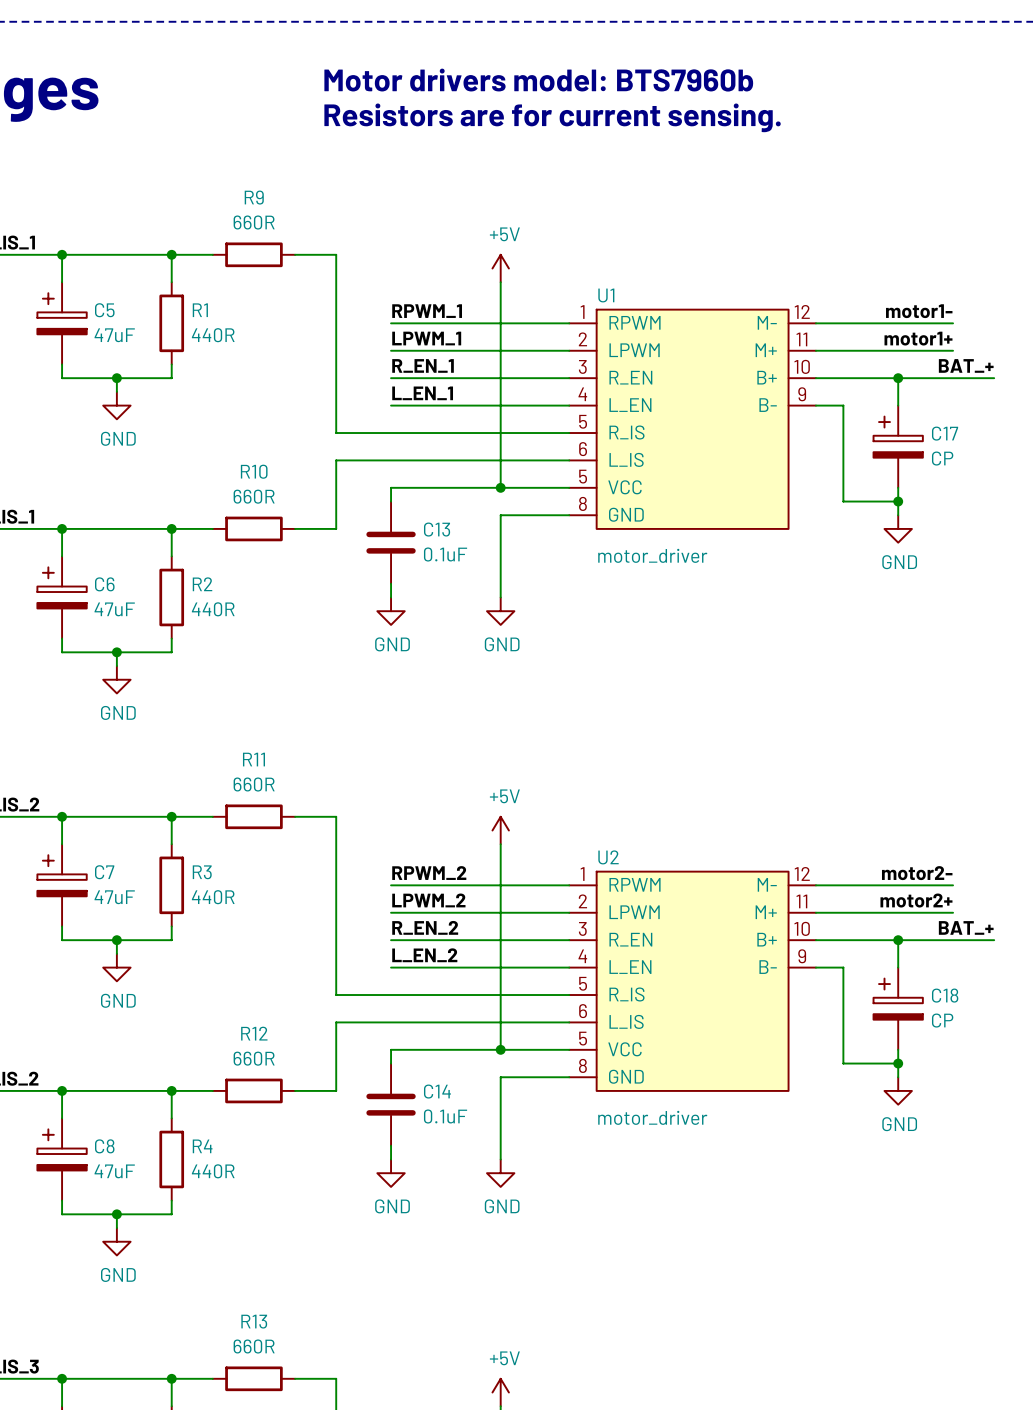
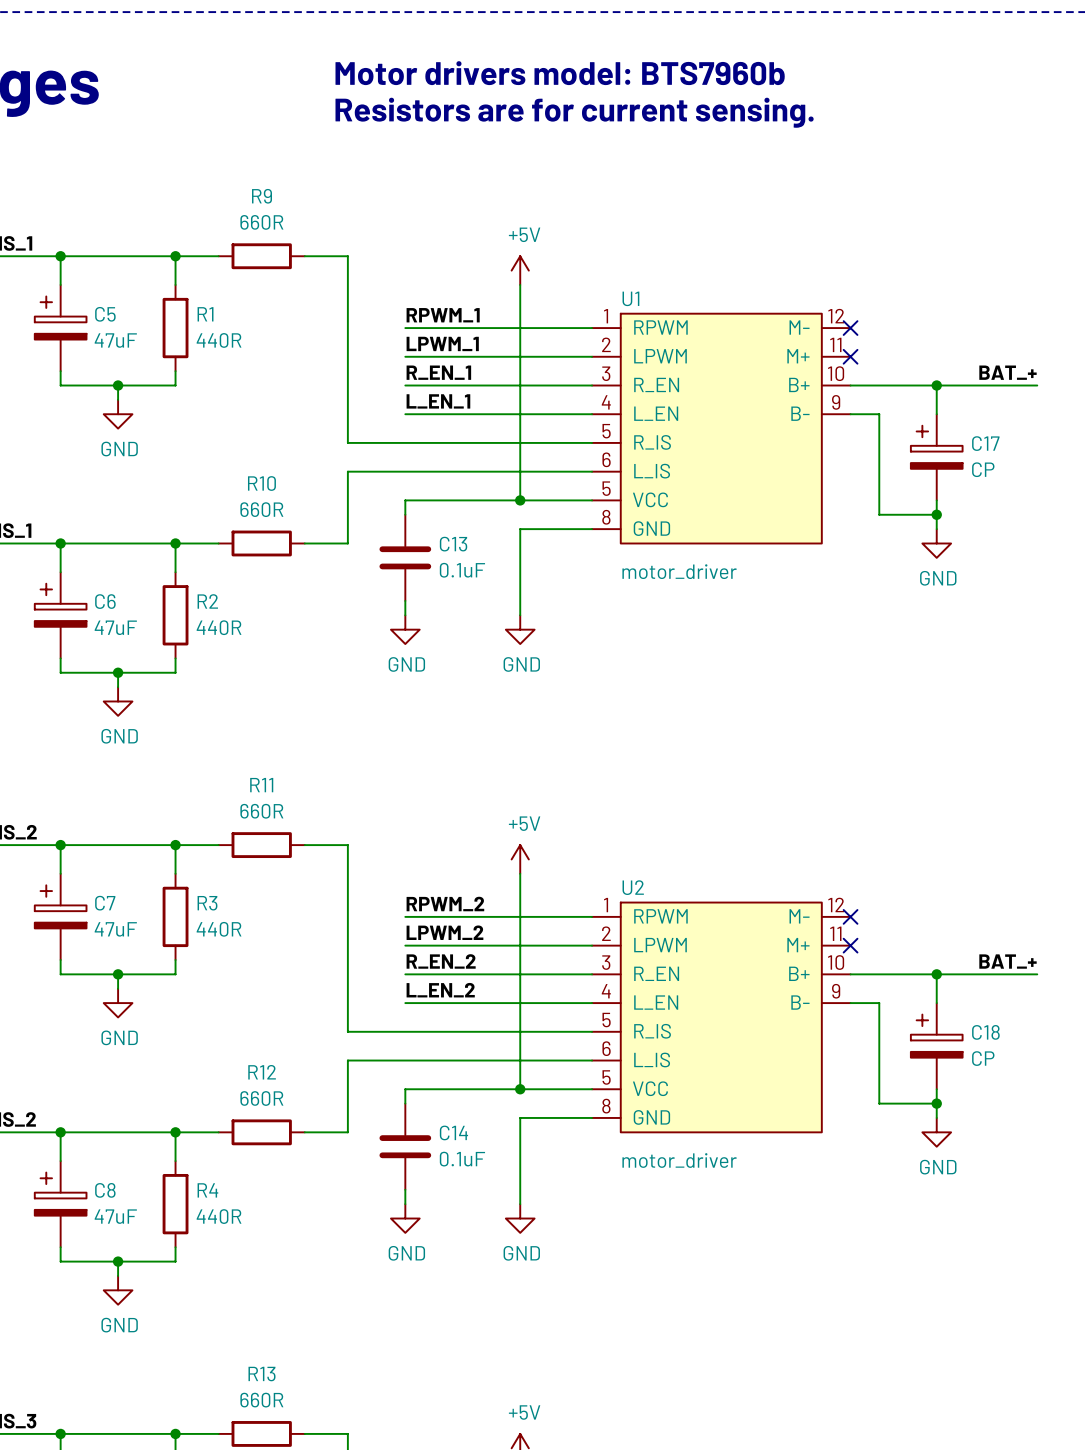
label: motor1- (919, 311) -> none
wire: (815, 323) (953, 323) -> none
no-connect mark: none -> (850, 328)
label: motor1+ (918, 338) -> none
wire: (815, 350) (953, 350) -> none
no-connect mark: none -> (850, 356)
label: motor2- (917, 873) -> none
wire: (815, 885) (953, 885) -> none
no-connect mark: none -> (850, 916)
label: motor2+ (916, 900) -> none
wire: (815, 912) (953, 912) -> none
no-connect mark: none -> (850, 945)

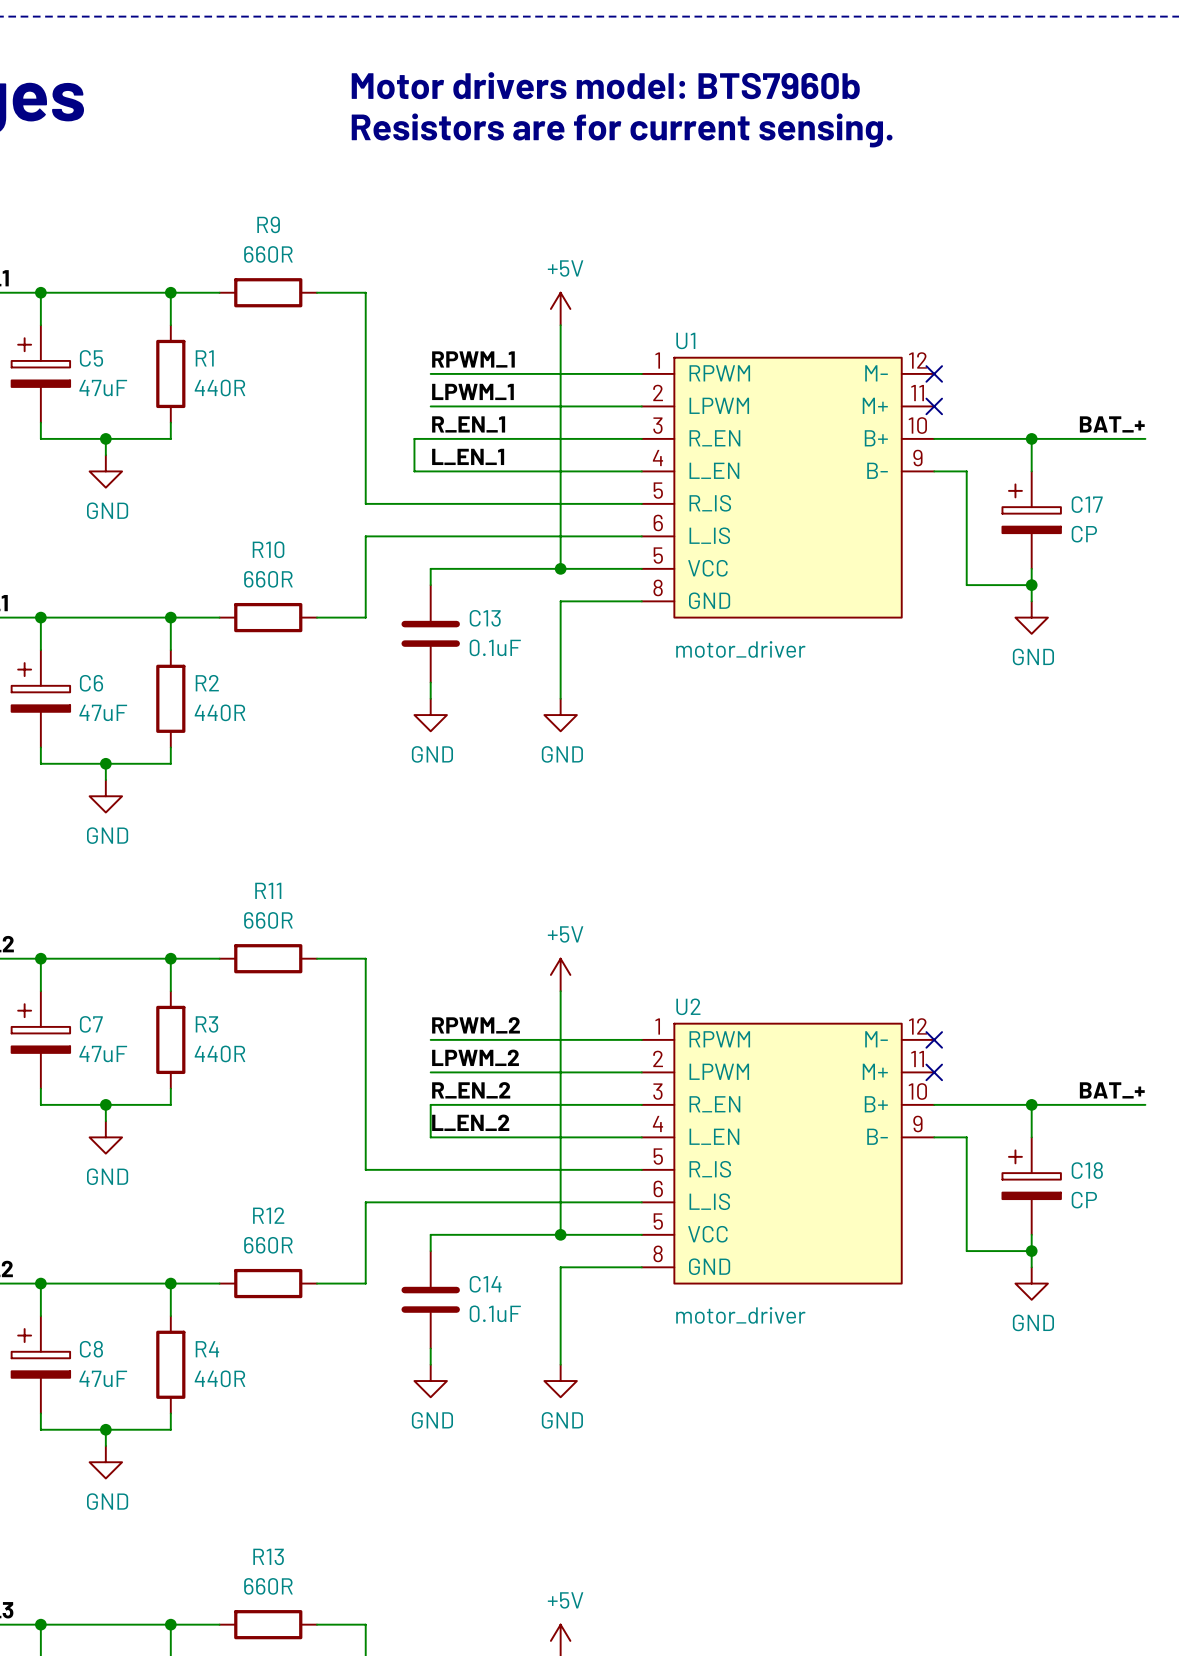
wire: none -> (430, 438) (414, 438) (414, 471) (430, 471)
wire: none -> (430, 1104) (430, 1137)

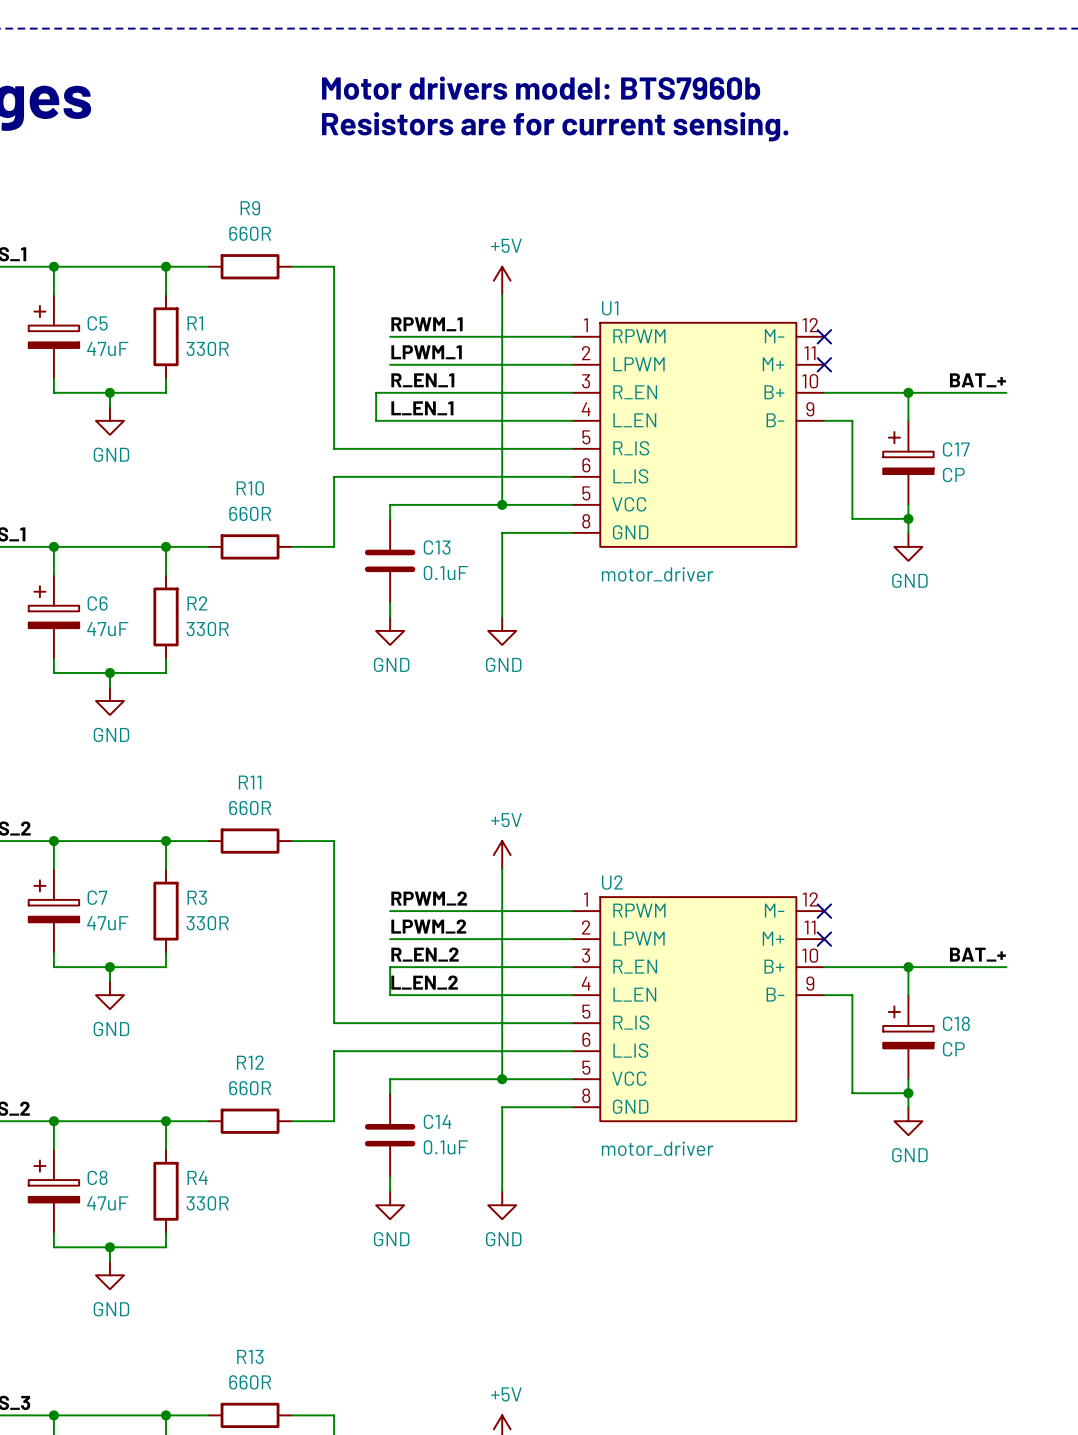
R1 value: 440R (219, 387) -> 330R (207, 348)
R2 value: 440R (219, 712) -> 330R (207, 629)
R3 value: 440R (219, 1053) -> 330R (207, 923)
R4 value: 440R (219, 1378) -> 330R (207, 1203)

